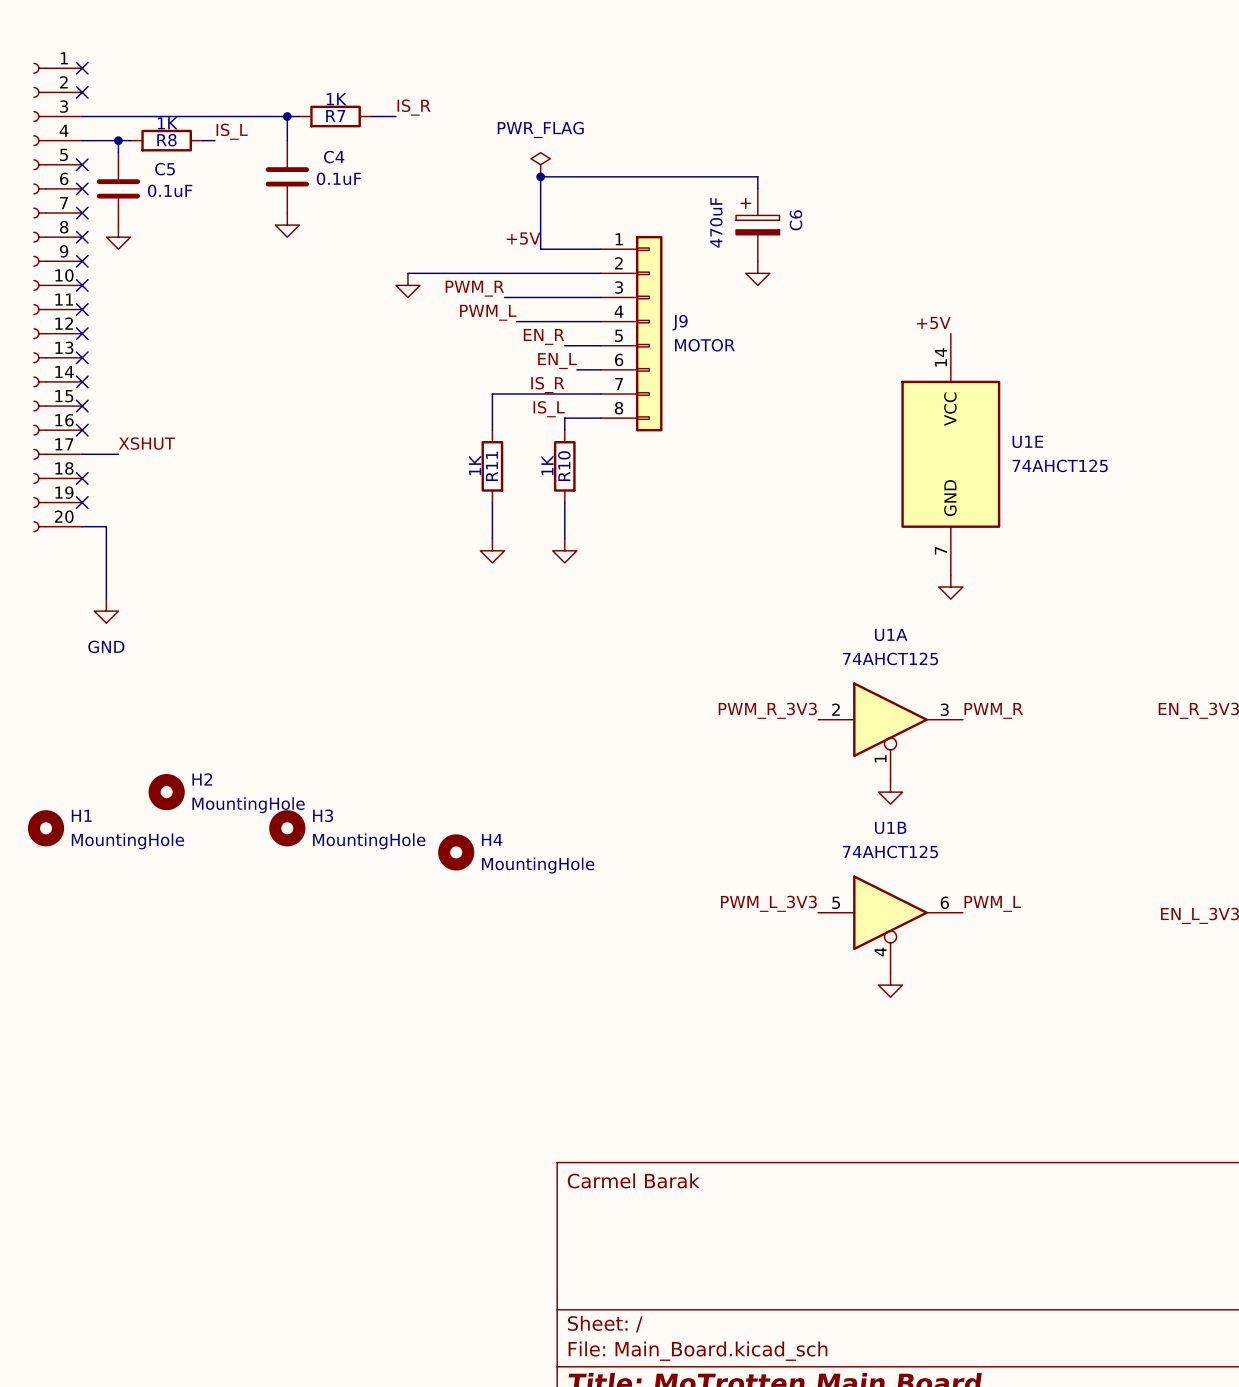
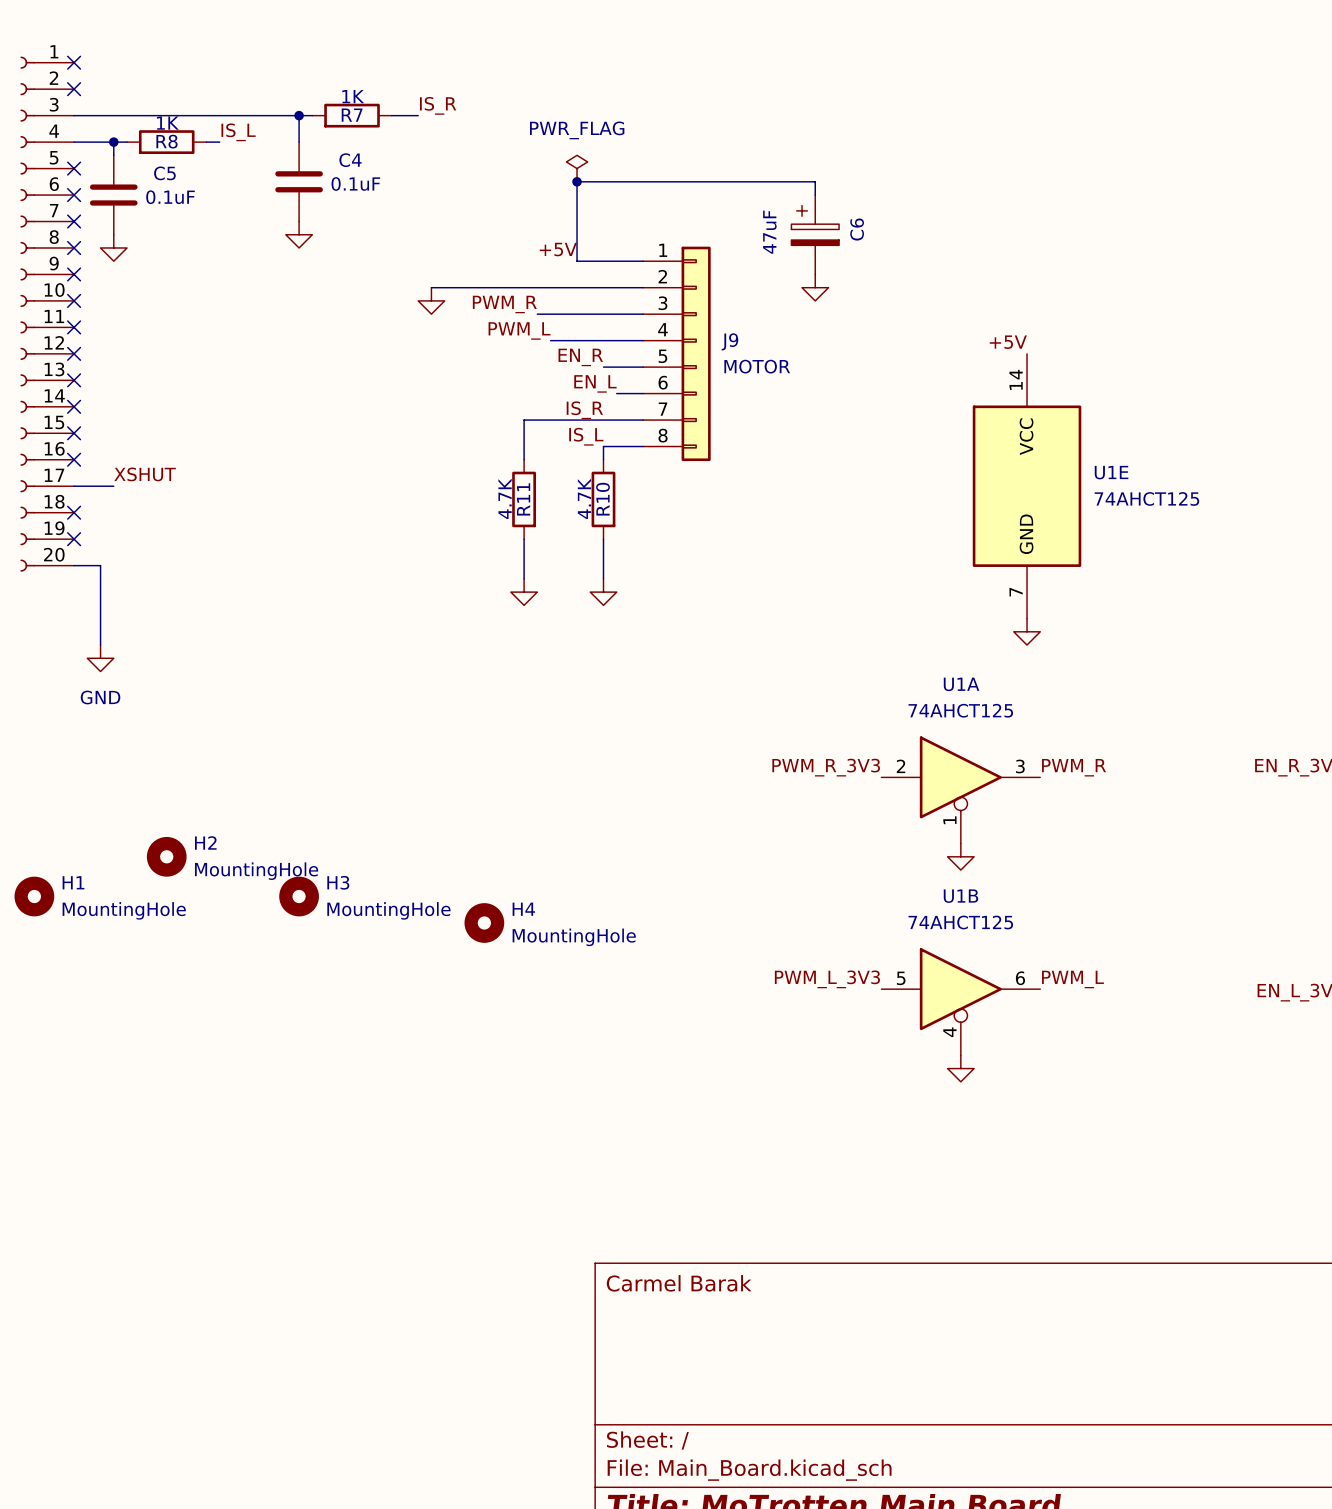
C6 value: 470uF (716, 222) -> 47uF (769, 232)
R11 value: 1K (475, 465) -> 4.7K (505, 498)
R10 value: 1K (547, 465) -> 4.7K (584, 498)

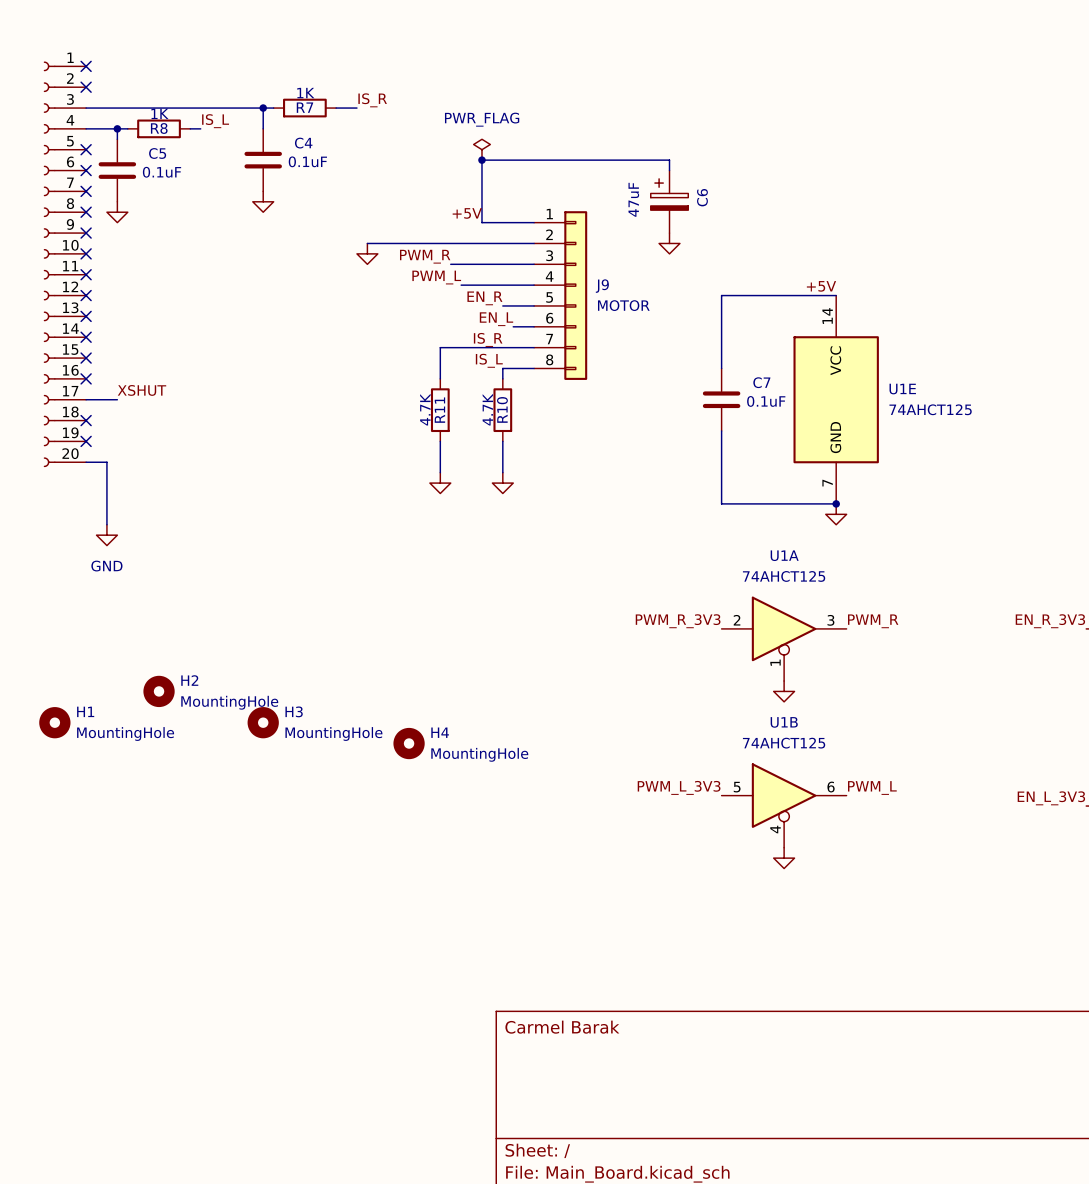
wire: none -> (836, 295) (721, 295) (721, 368)
C7: none -> 0.1uF (721, 399)
wire: none -> (721, 430) (721, 503) (836, 503)
junction: none -> (836, 503)

